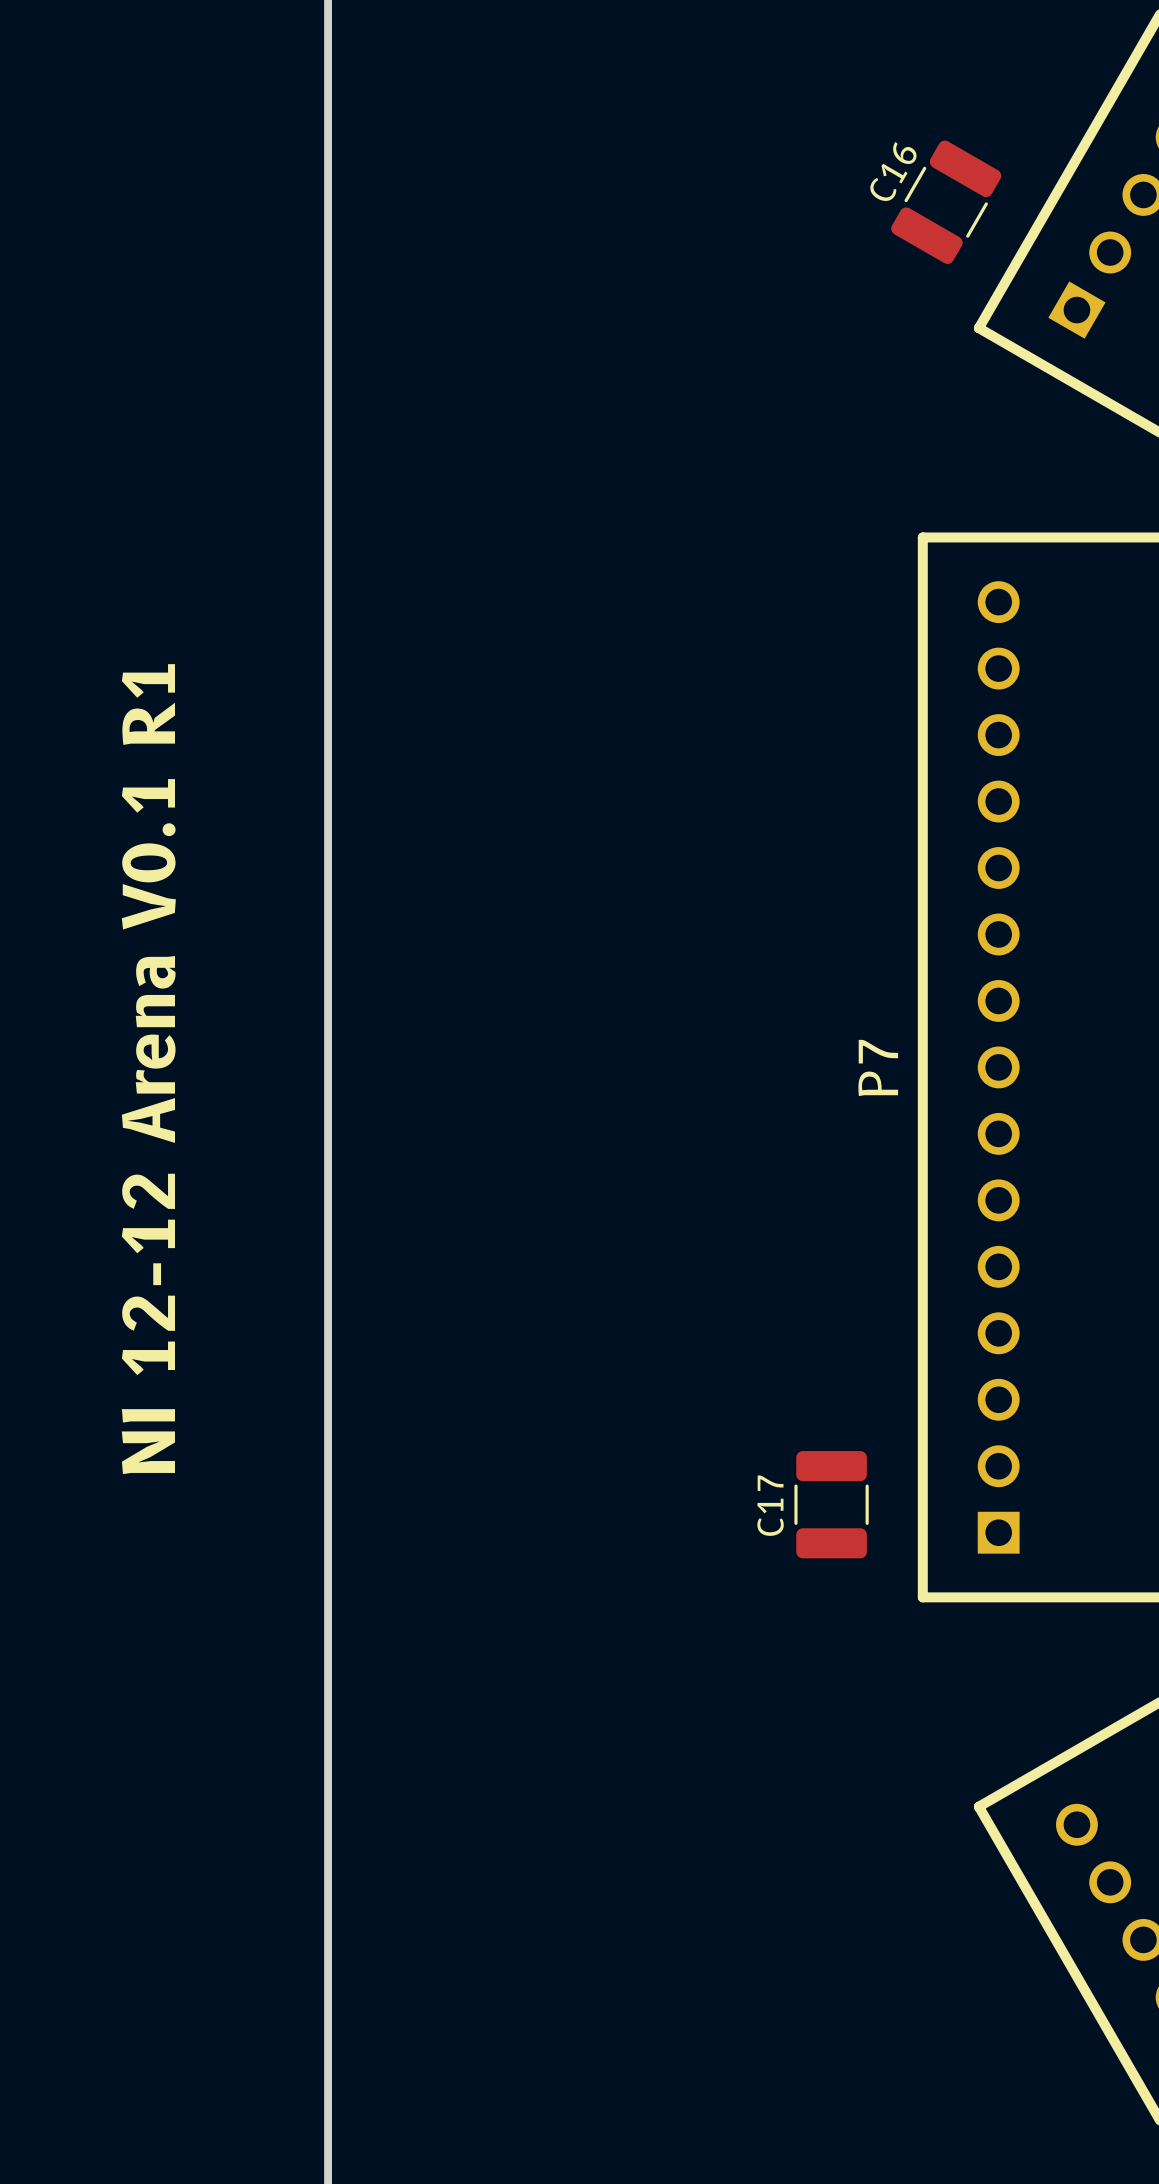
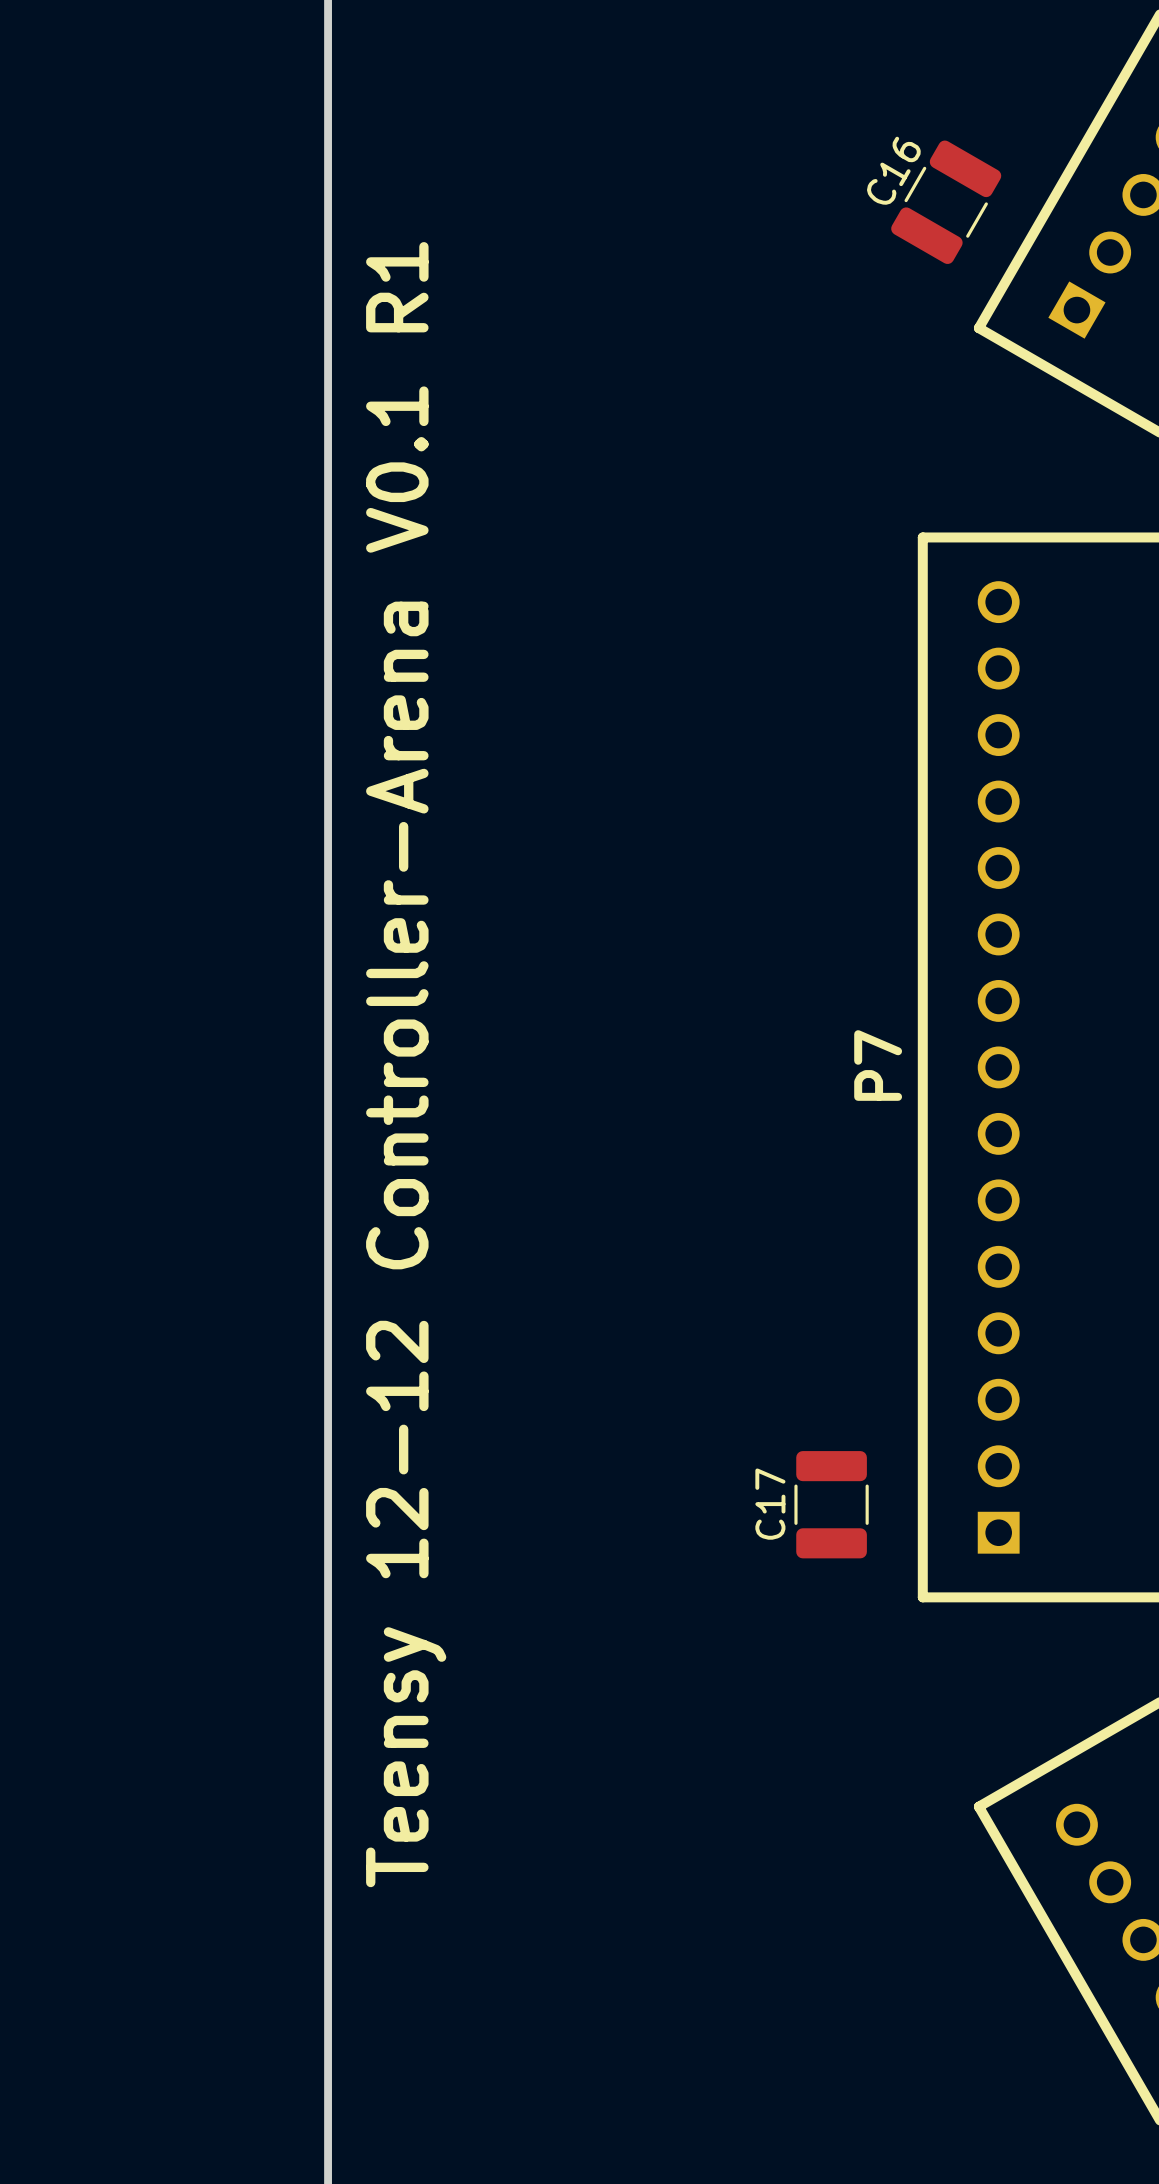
text: none -> Teensy 12-12 Controller-Arena V0.1 R1 (406, 1064)
text: NI 12-12 Arena V0.1 R1 (148, 1069) -> none

